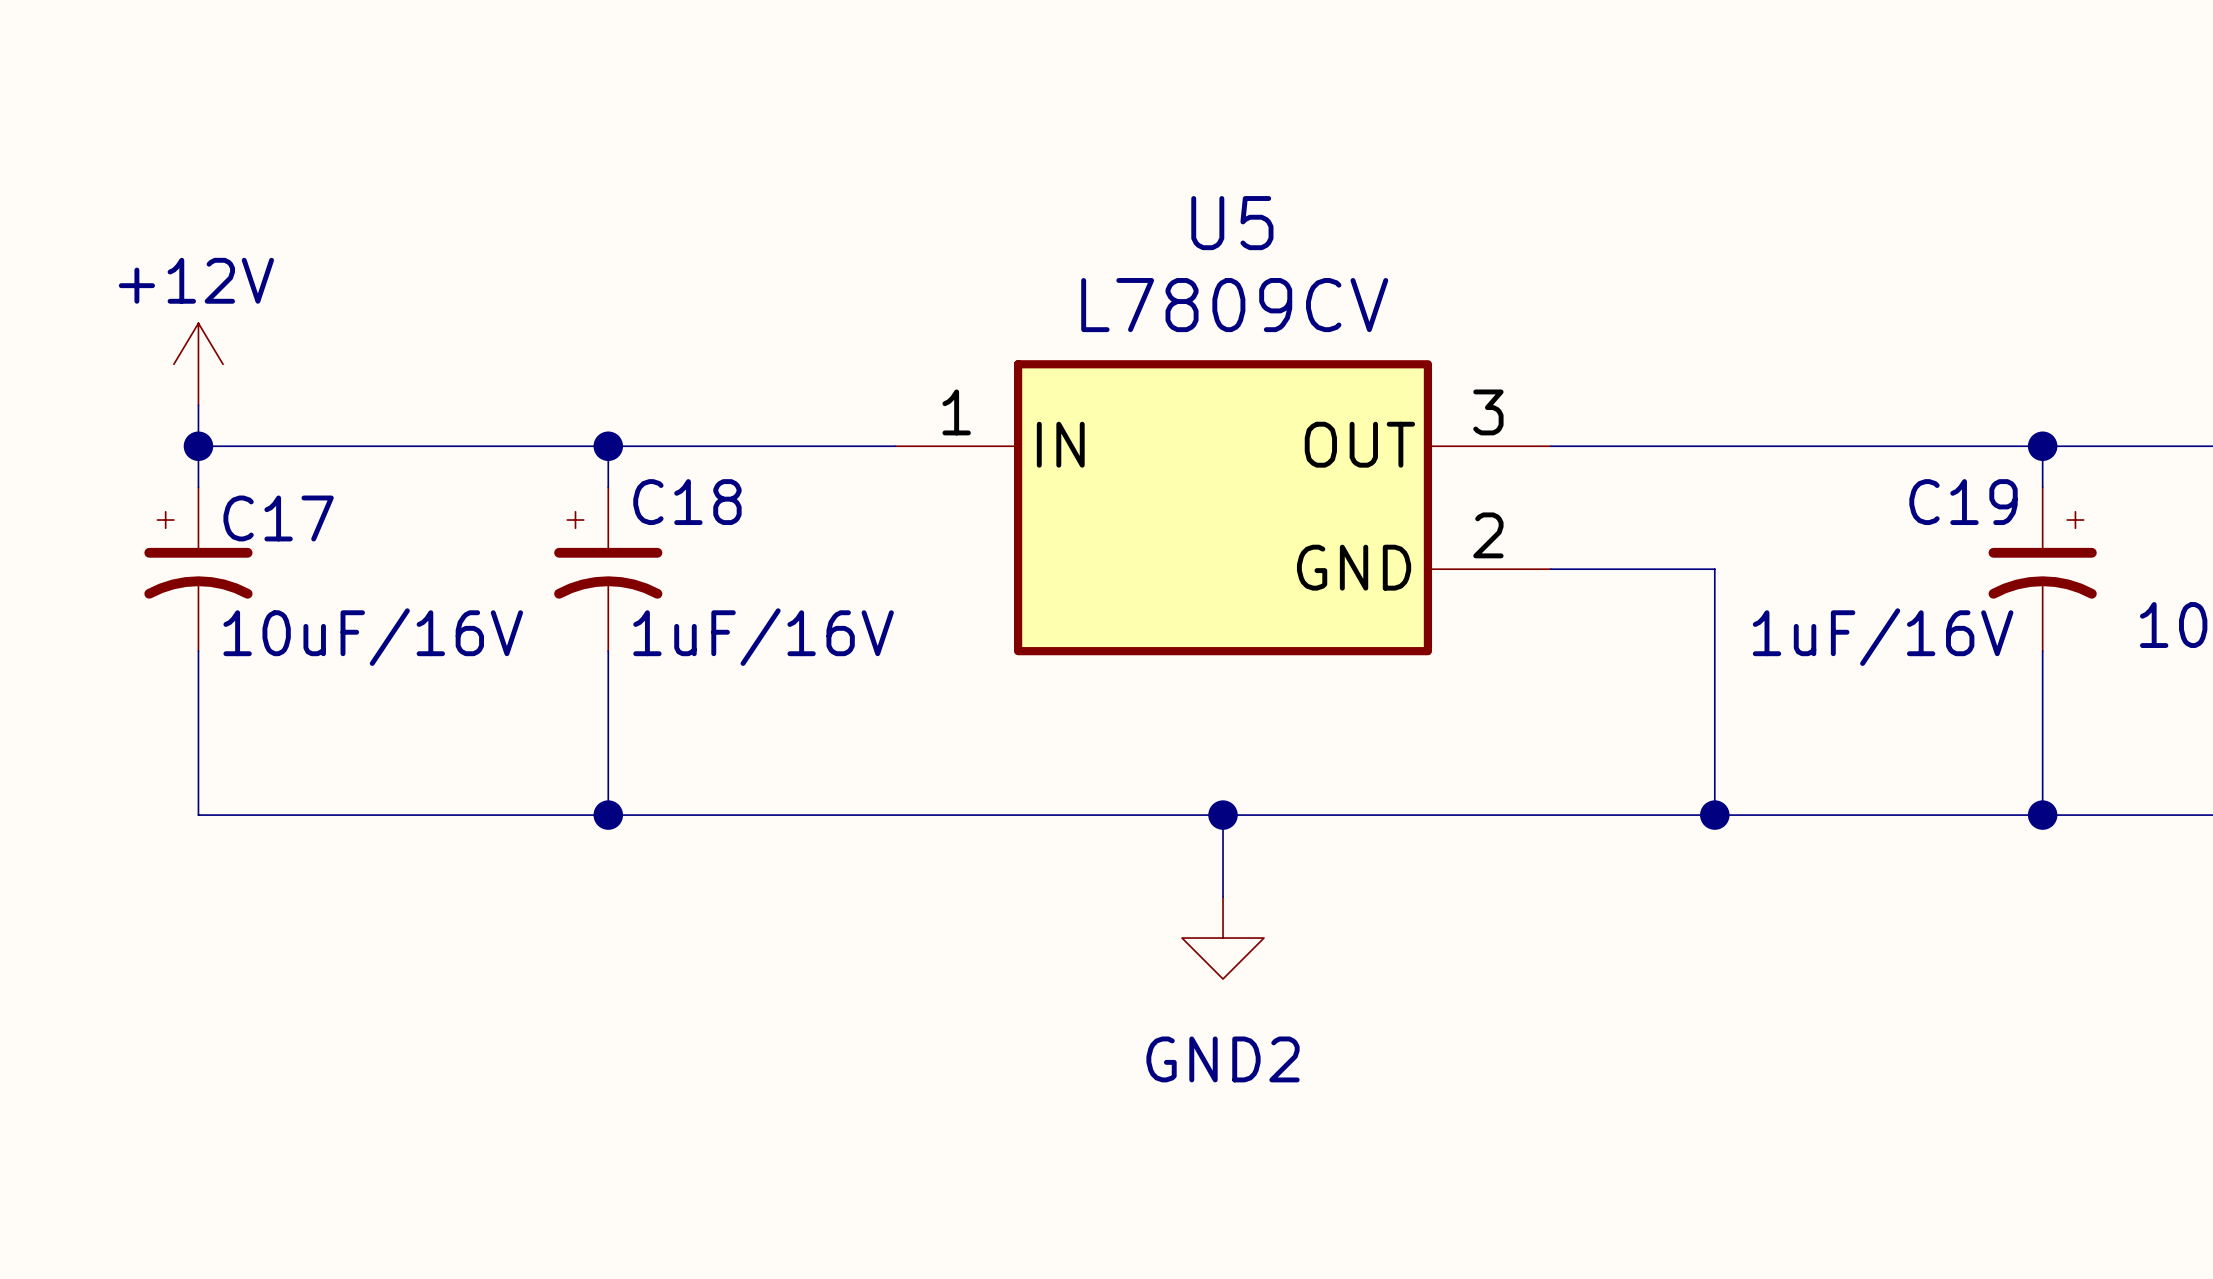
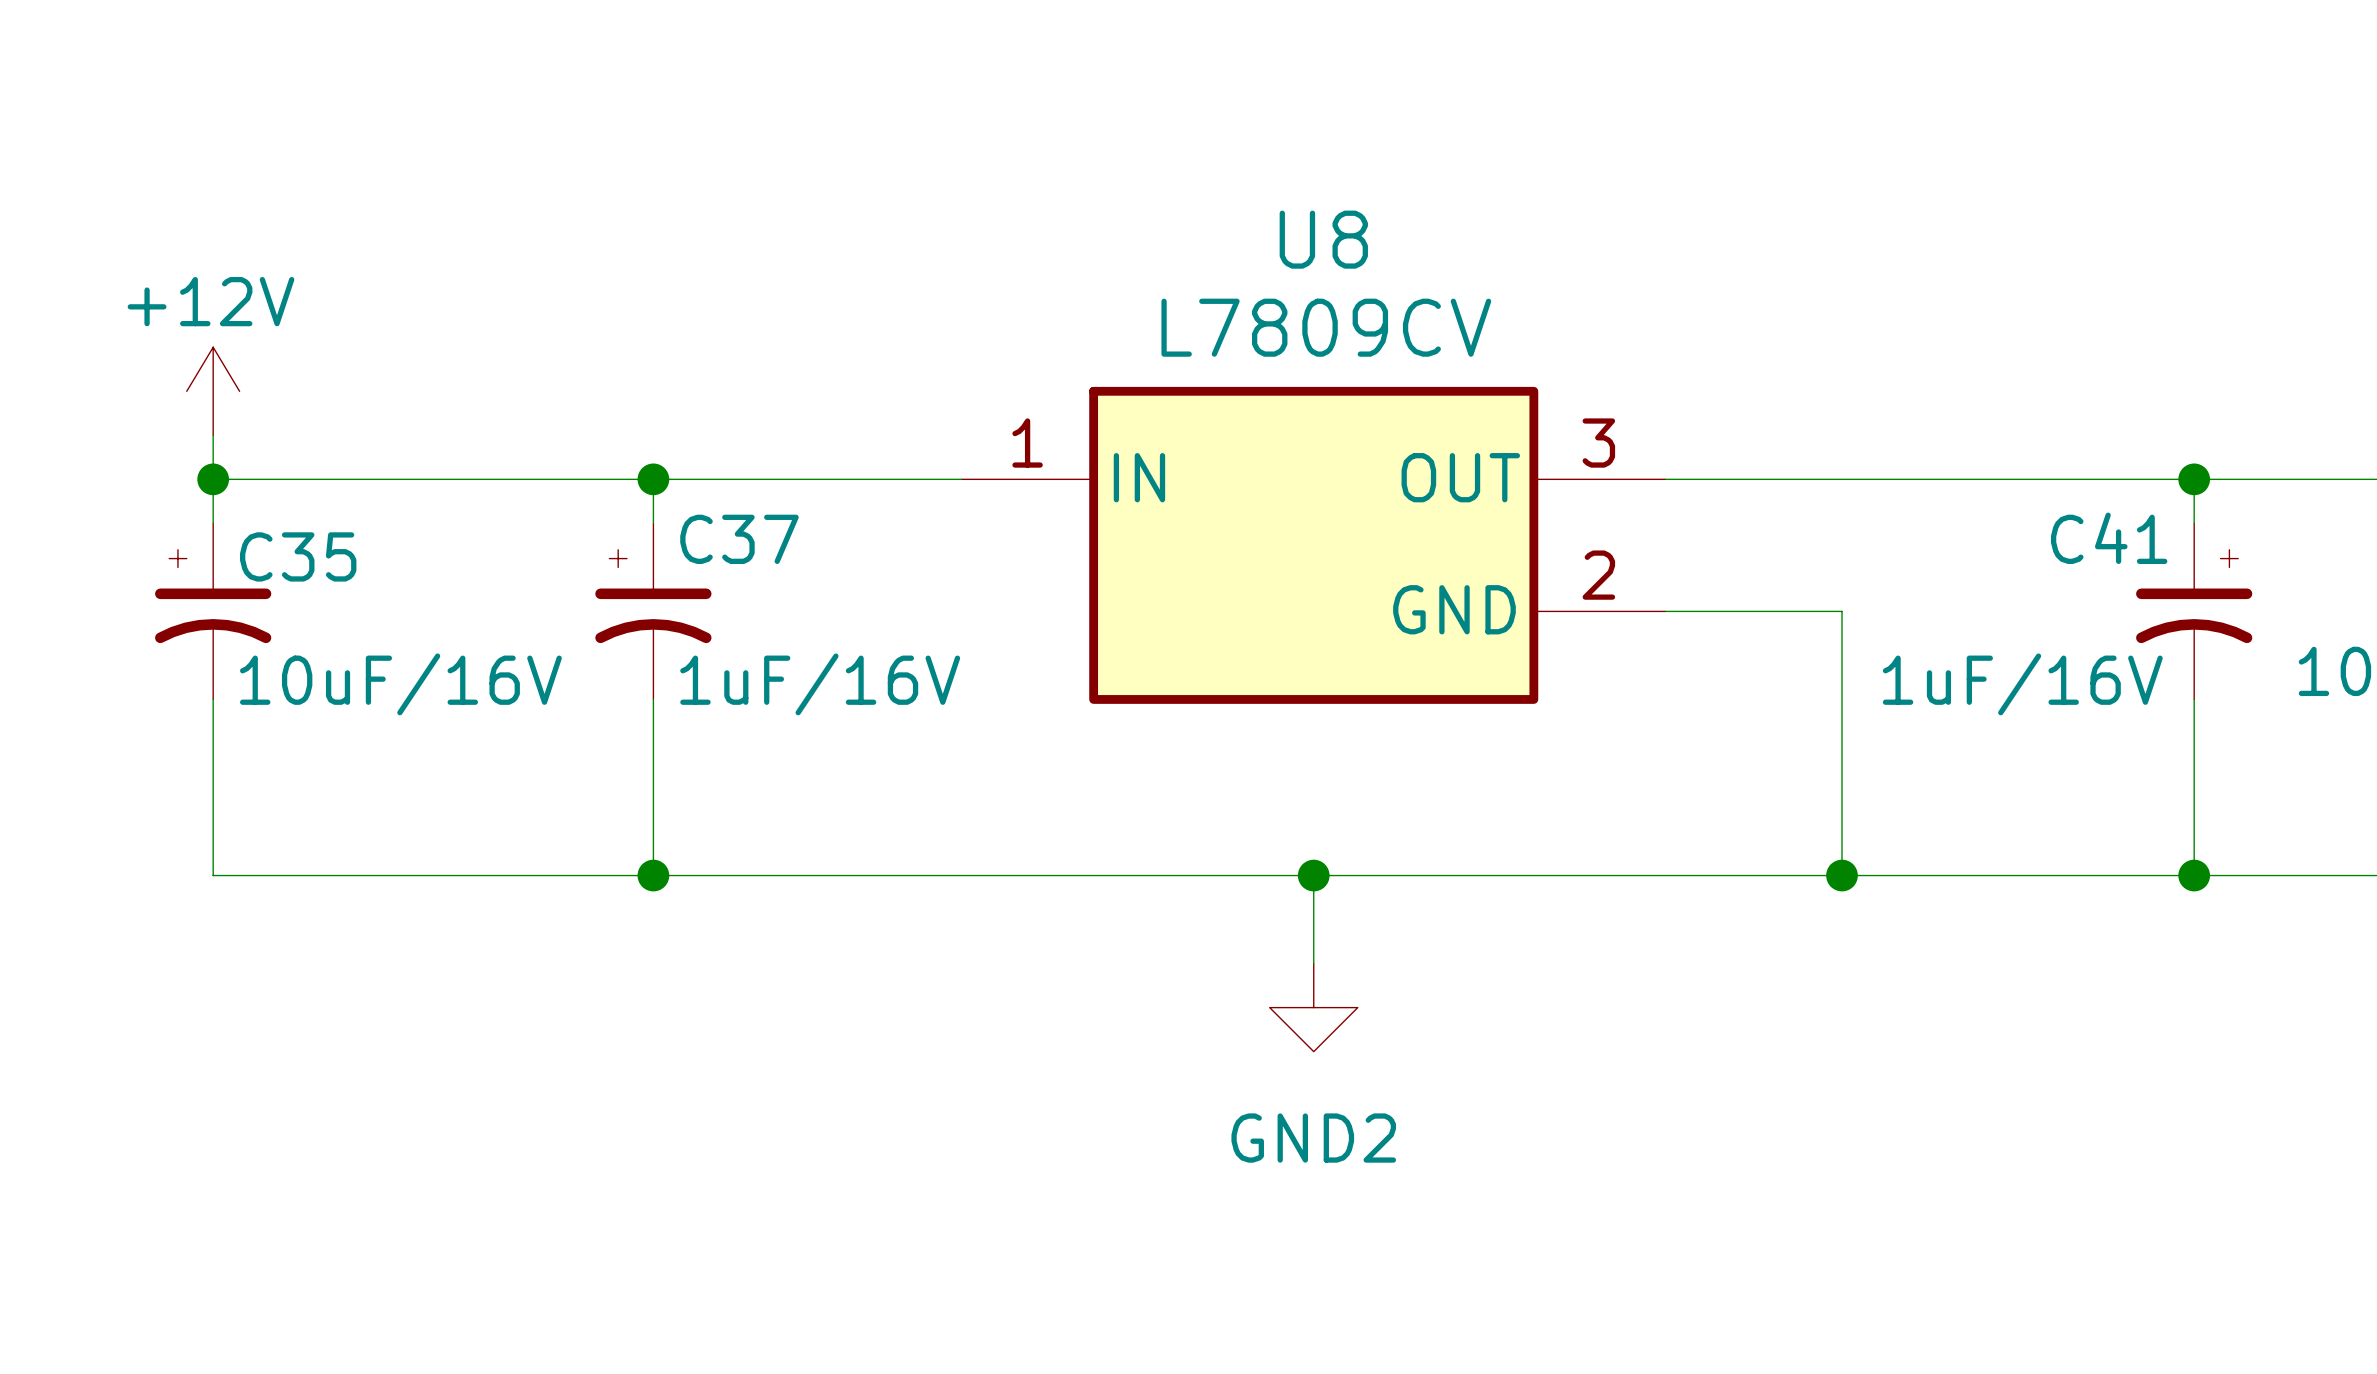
U5 name: U5 (1232, 223) -> U8 (1323, 239)
C18 name: C18 (687, 502) -> C37 (739, 539)
C19 name: C19 (1963, 502) -> C41 (2109, 538)
C17 name: C17 (278, 518) -> C35 (298, 556)

